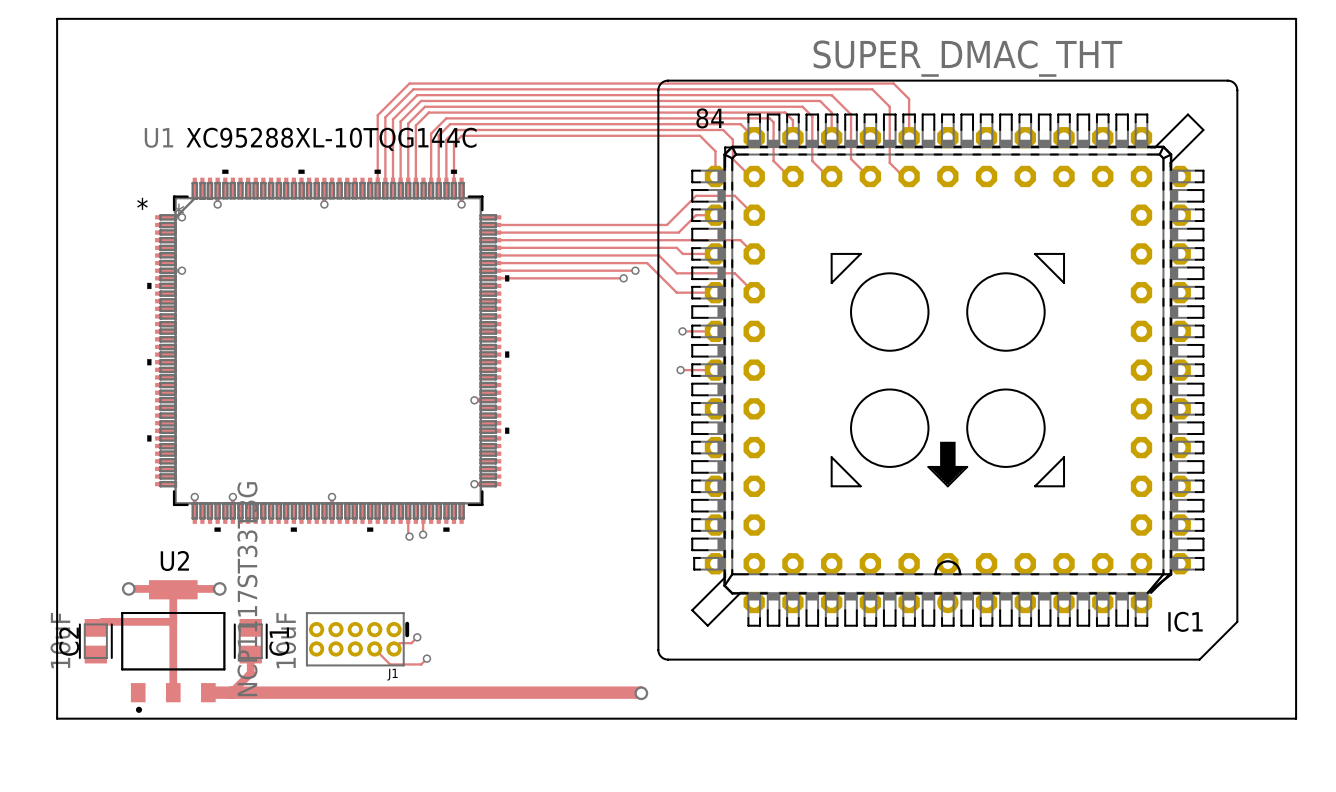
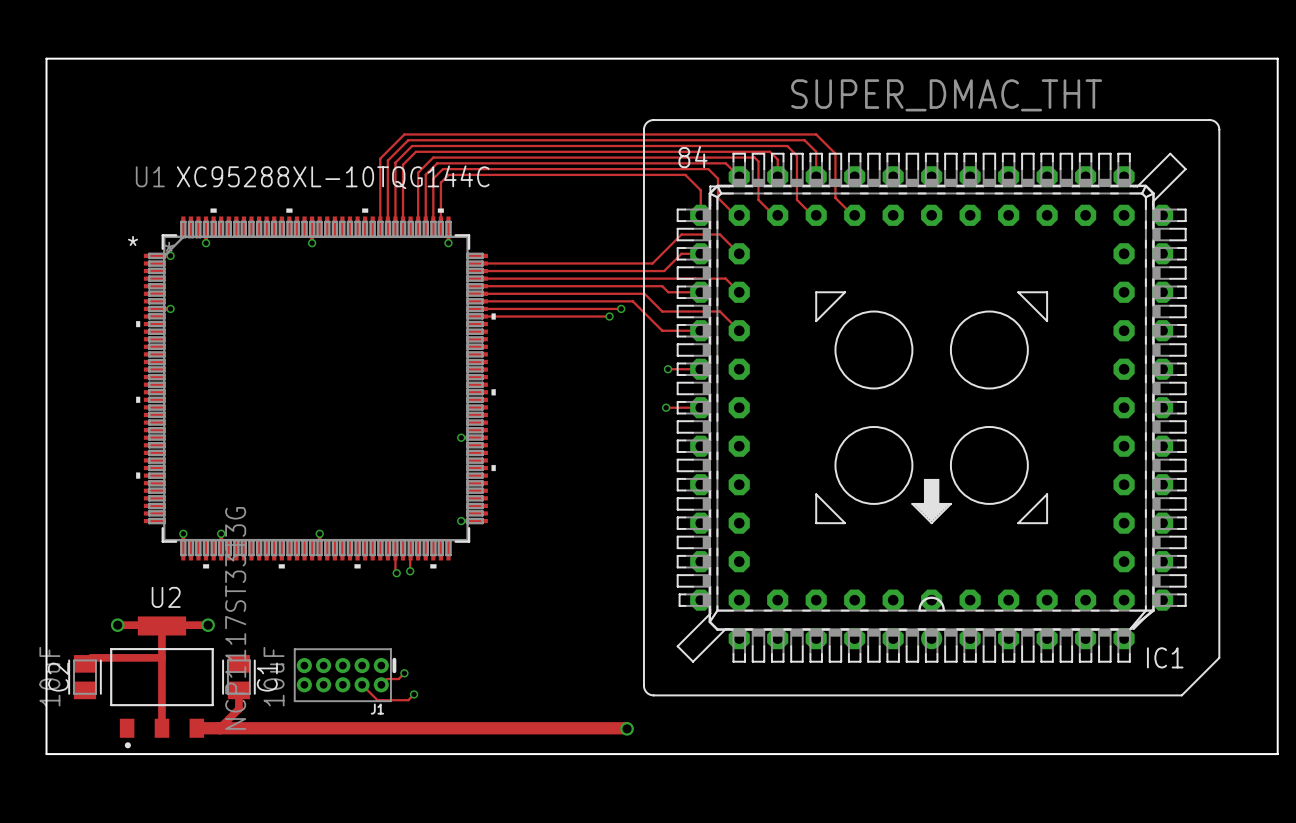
track: (909, 137) (909, 99) (893, 83) (409, 83) (377, 115) (377, 188) -> none
track: (909, 176) (903, 176) (889, 162) (889, 106) (872, 89) (413, 89) (385, 117) (385, 188) -> none

